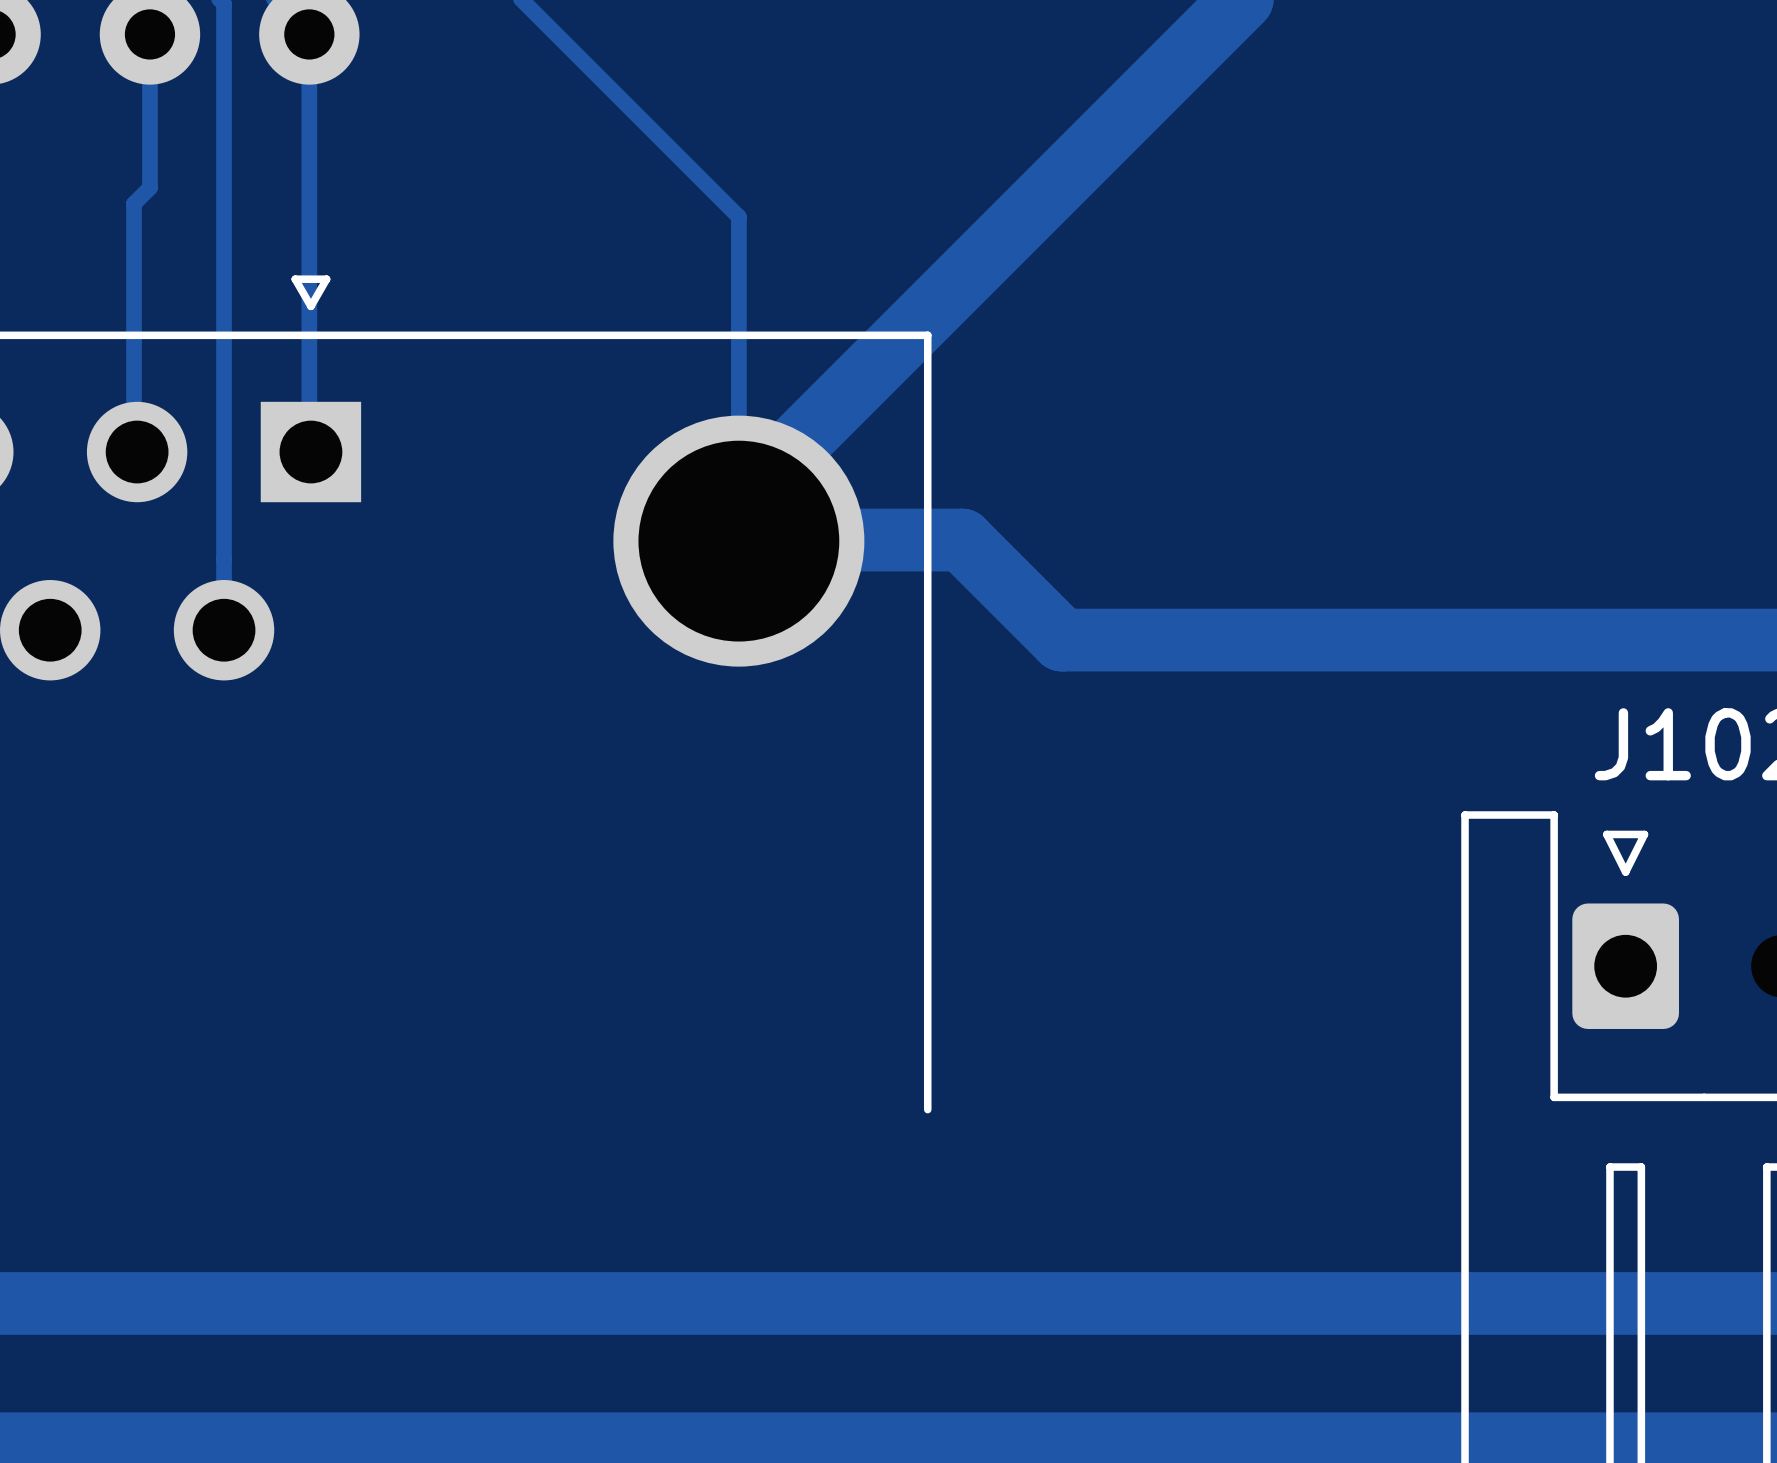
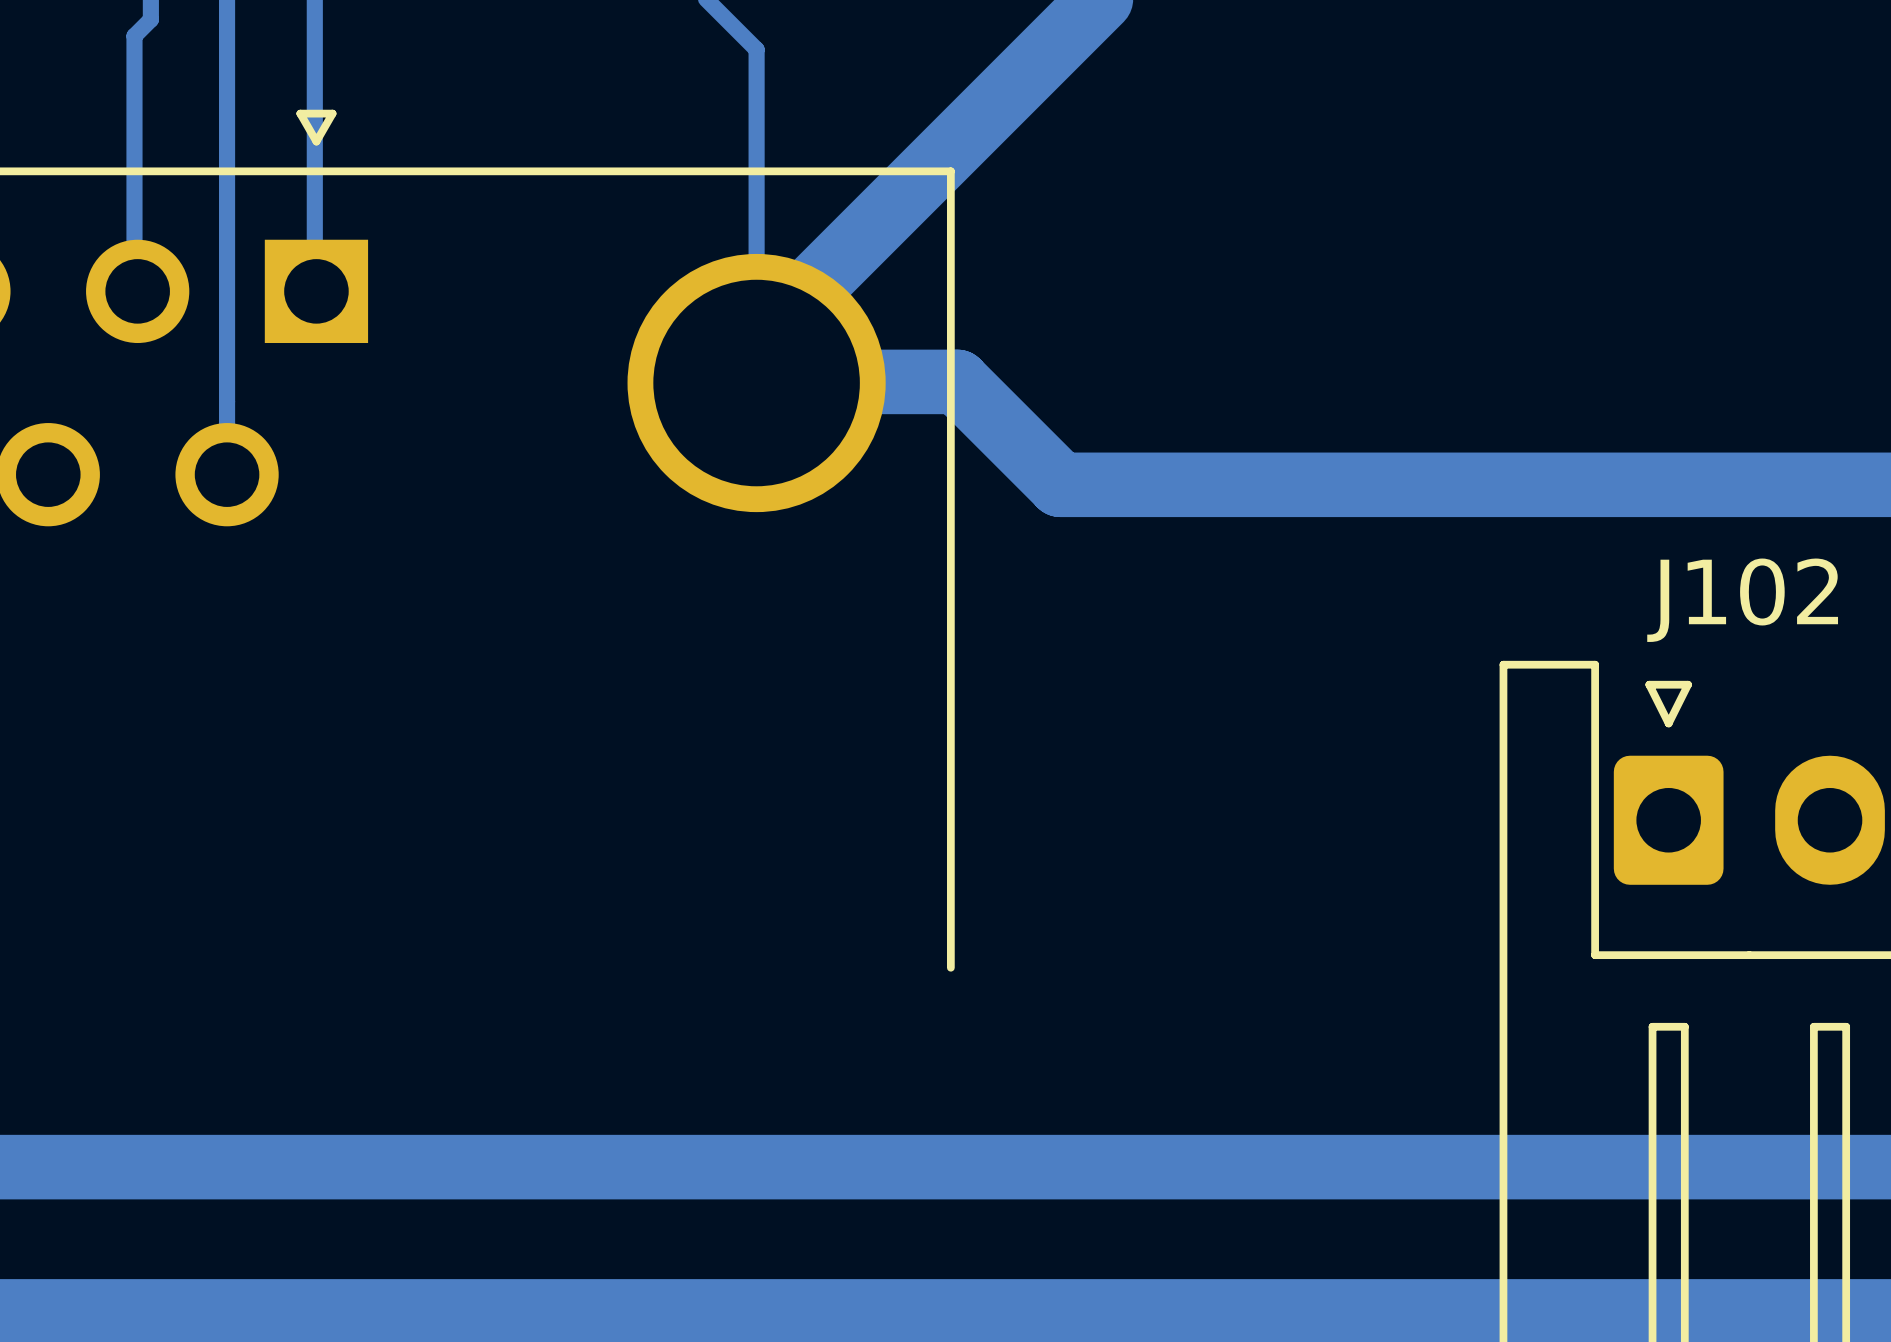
track: (934, 540) (962, 540) (1062, 640) -> (957, 381) (1060, 484) (1089, 484)

